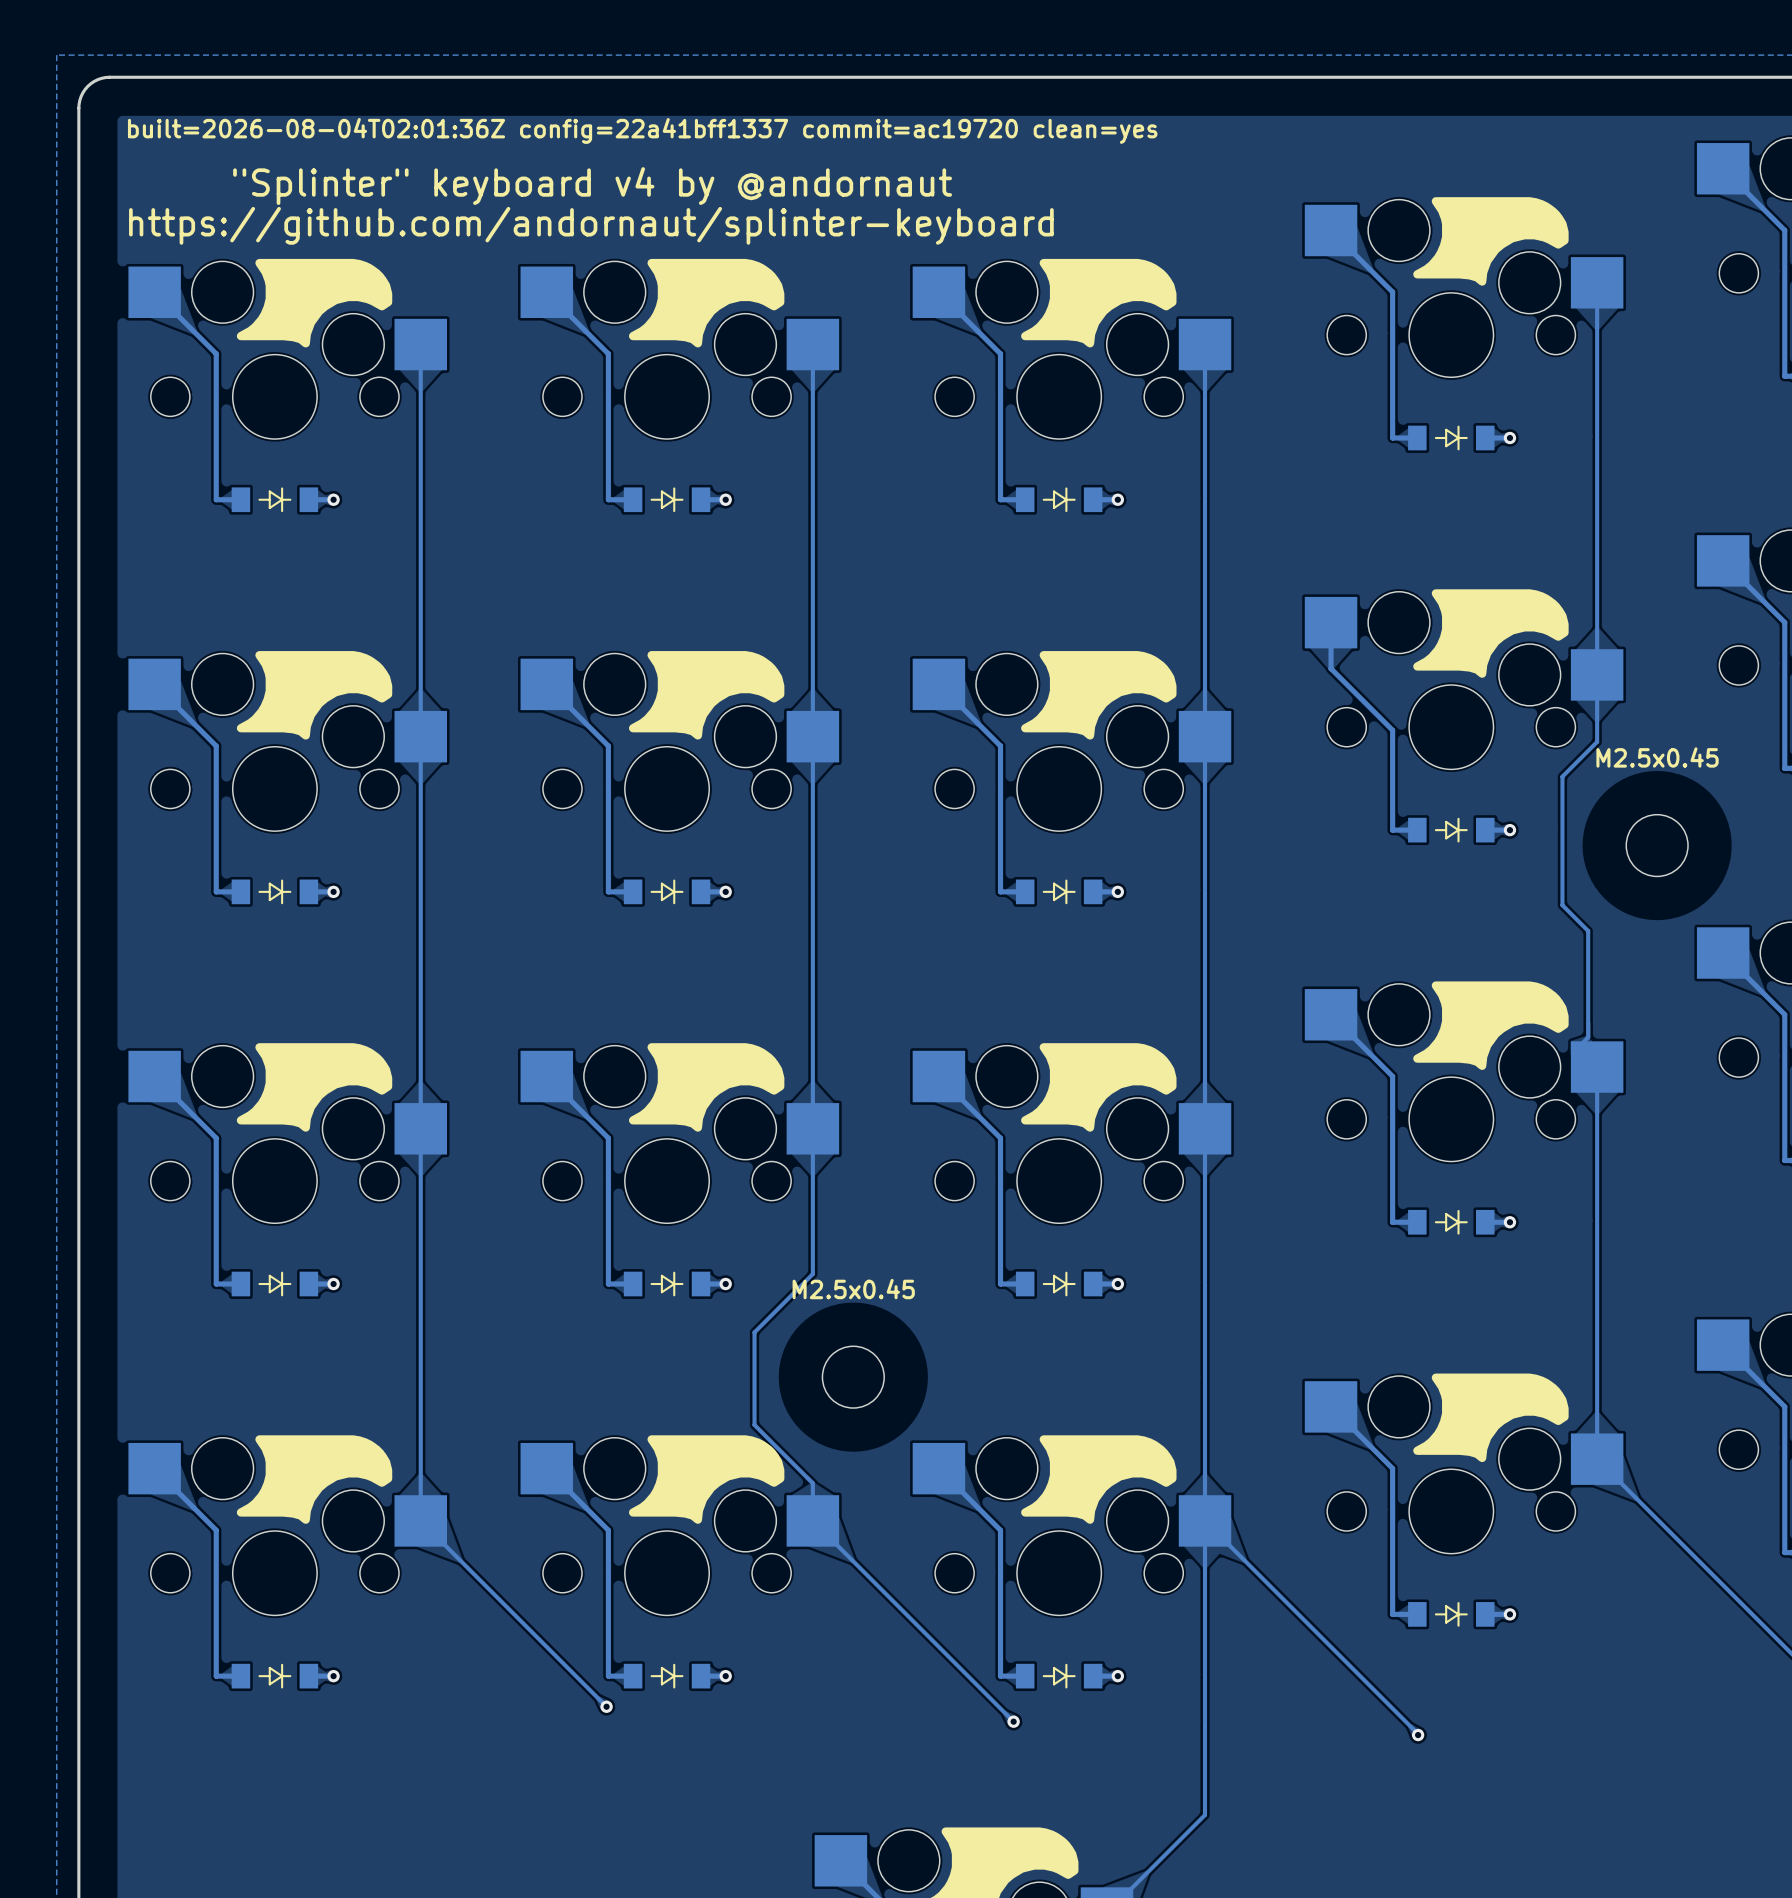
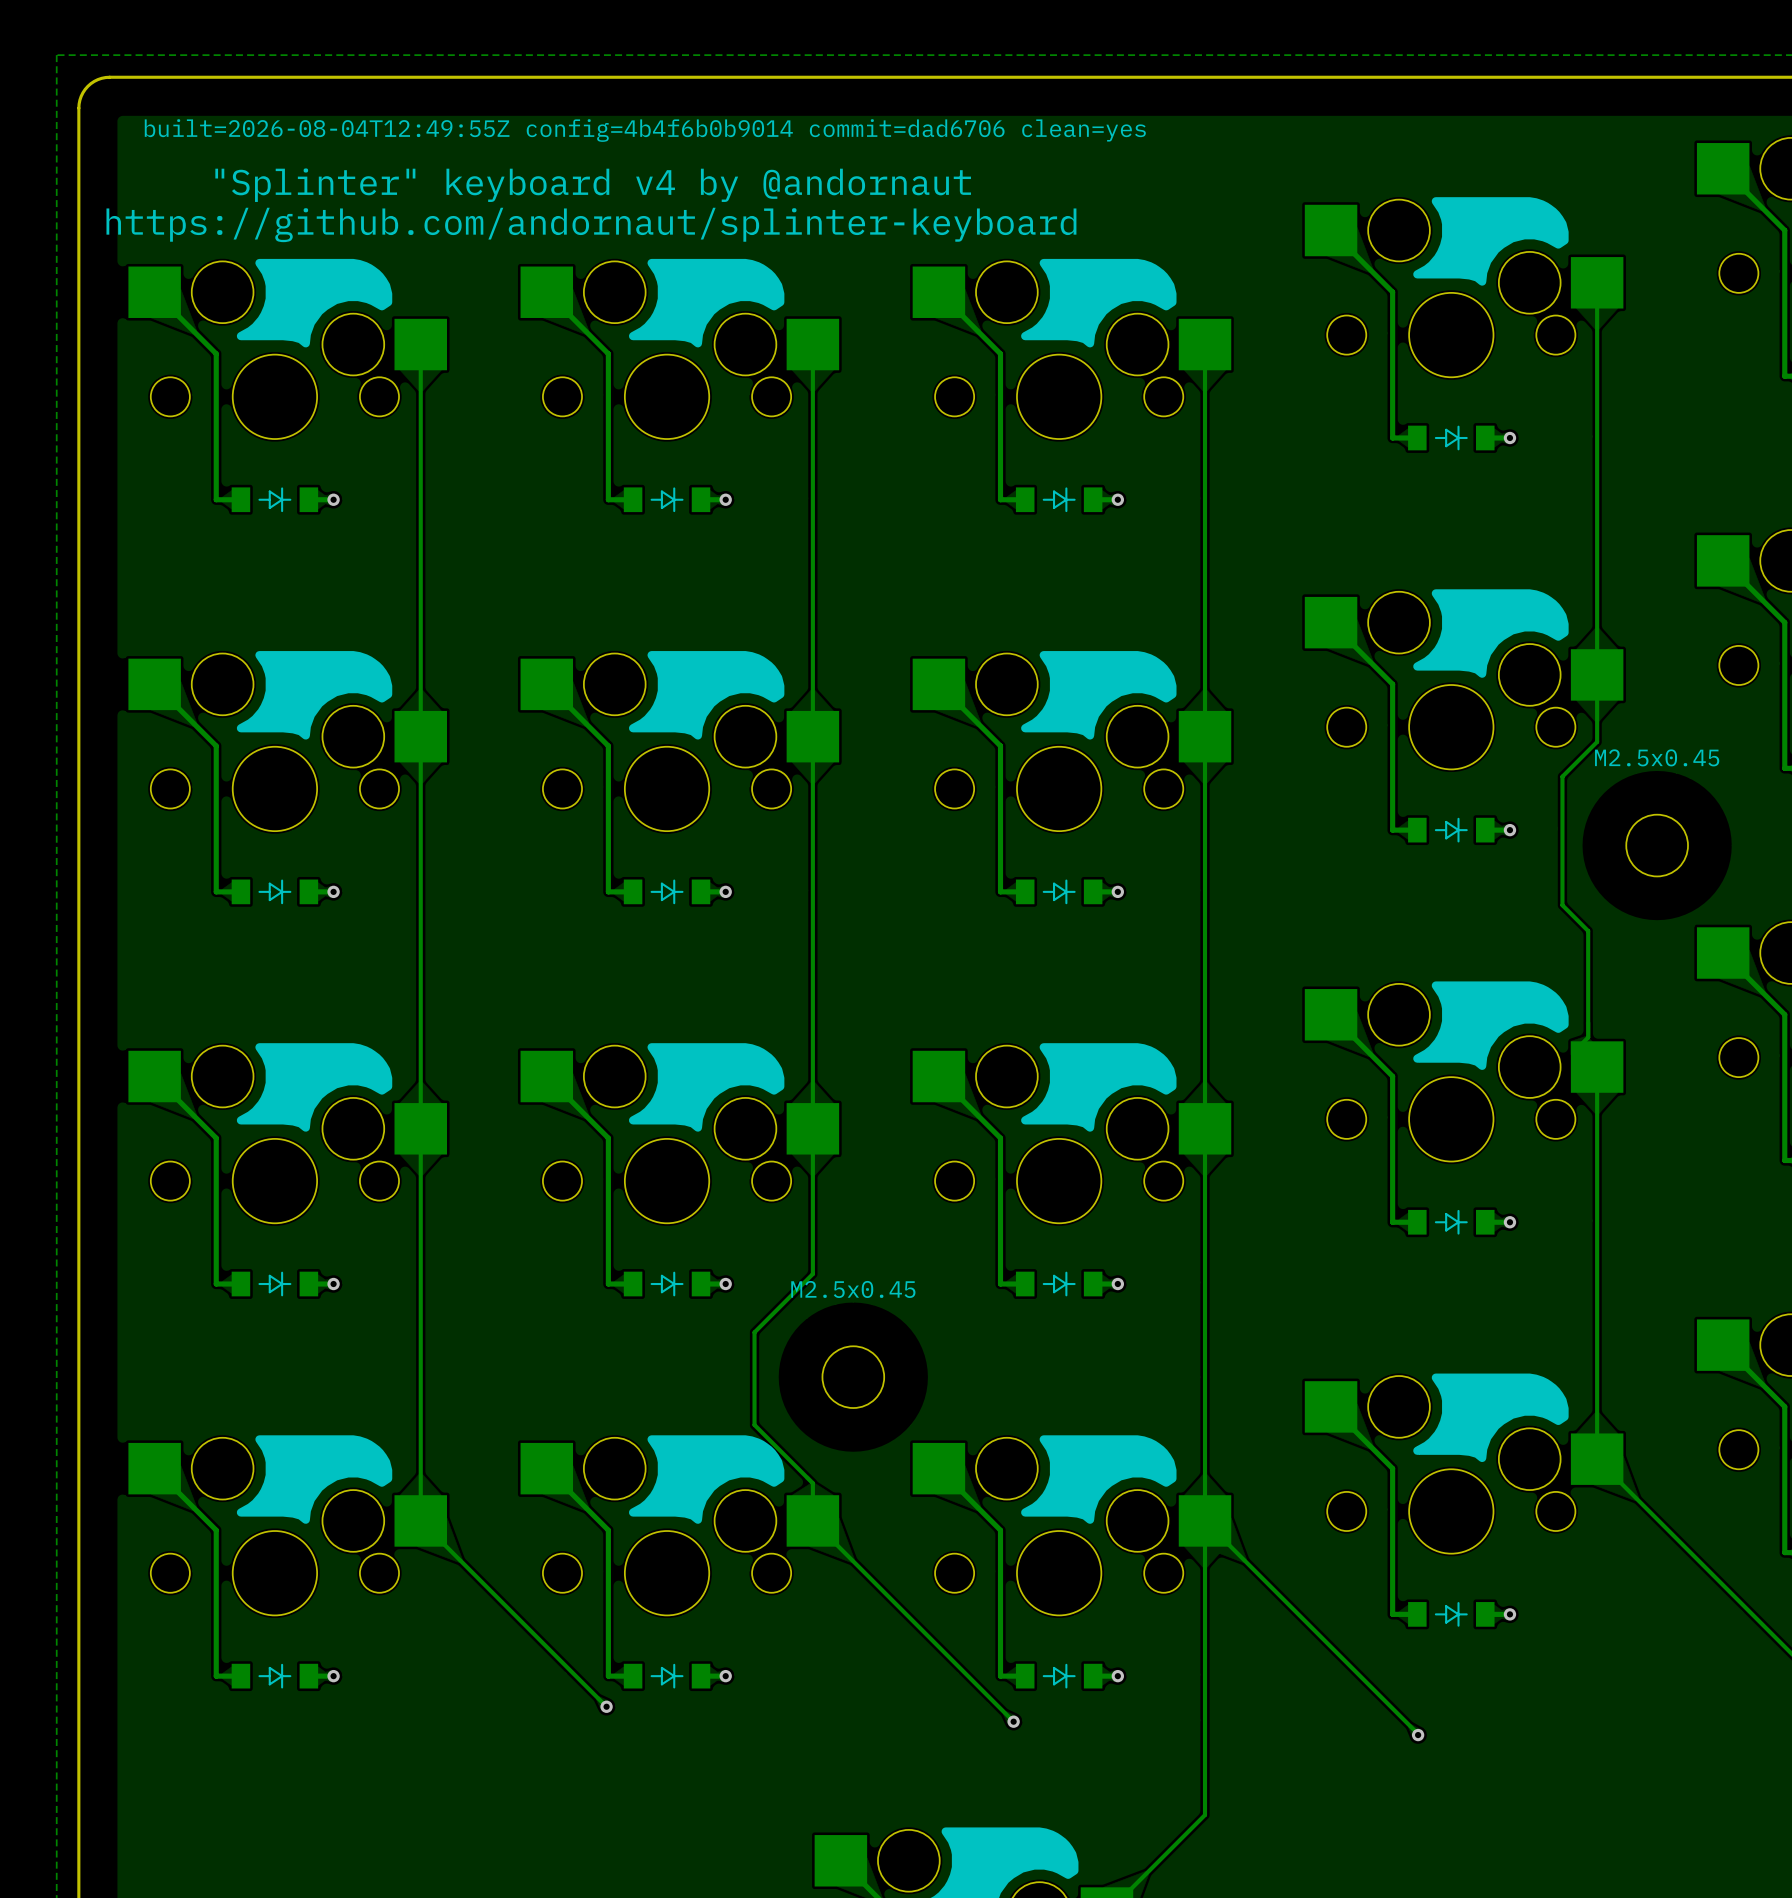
text: built=2026-08-04T02:01:36Z config=22a41bff1337 commit=ac19720 clean=yes (642, 130) -> built=2026-08-04T12:49:55Z config=4b4f6b0b9014 commit=dad6706 clean=yes (645, 130)
track: (1331, 622) (1331, 668) (1392, 730) -> (1331, 622) (1392, 684) (1392, 730)

